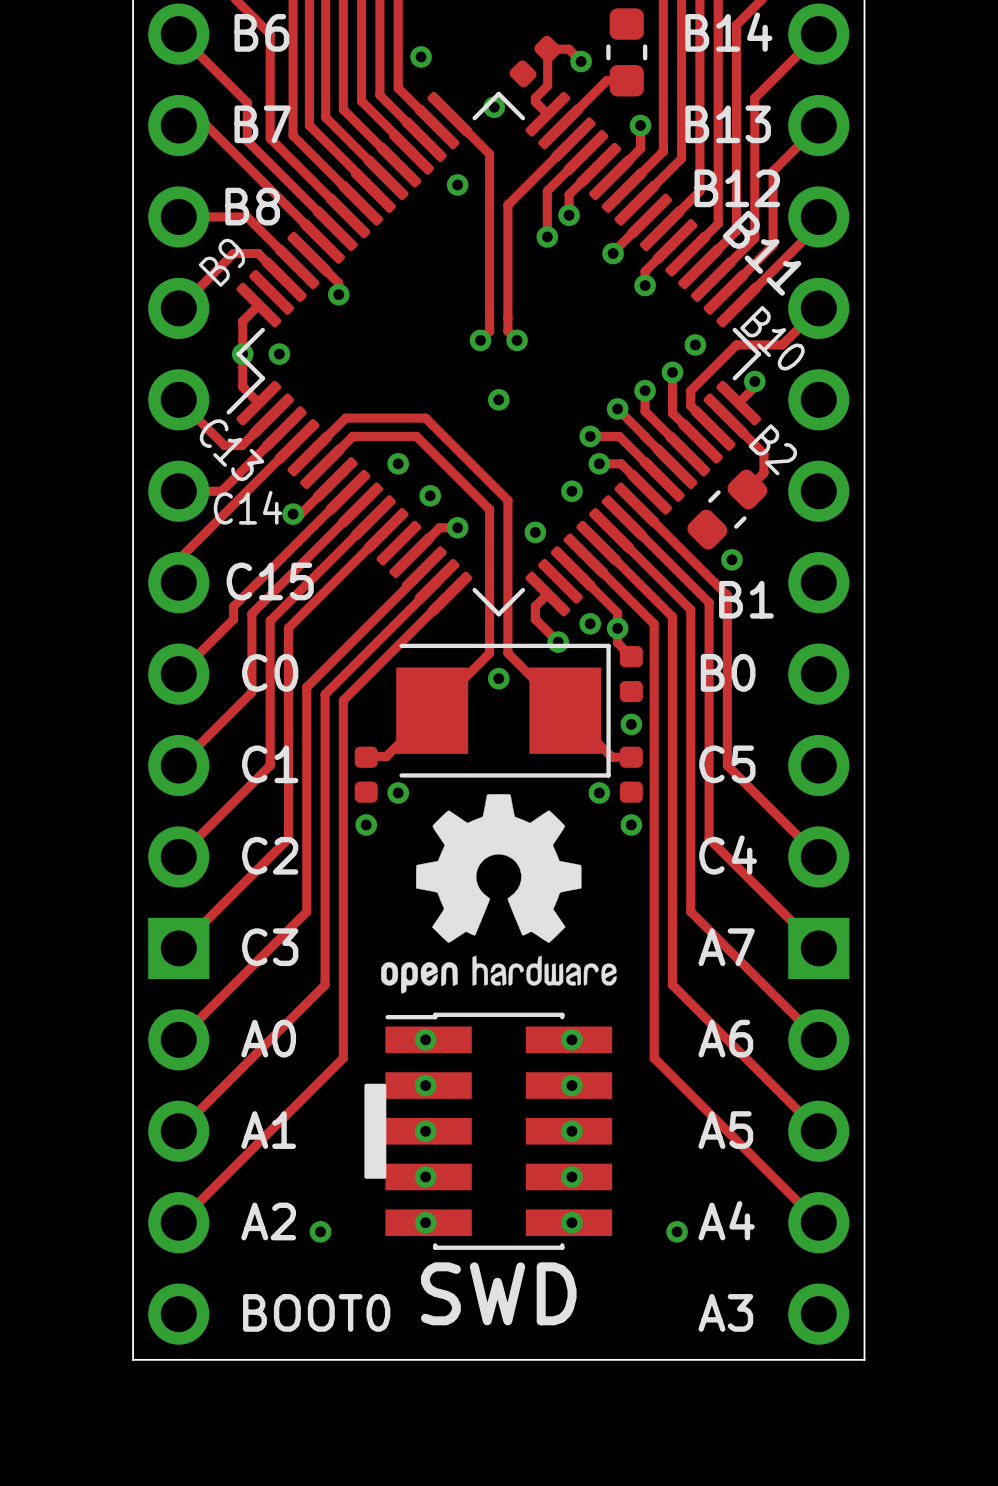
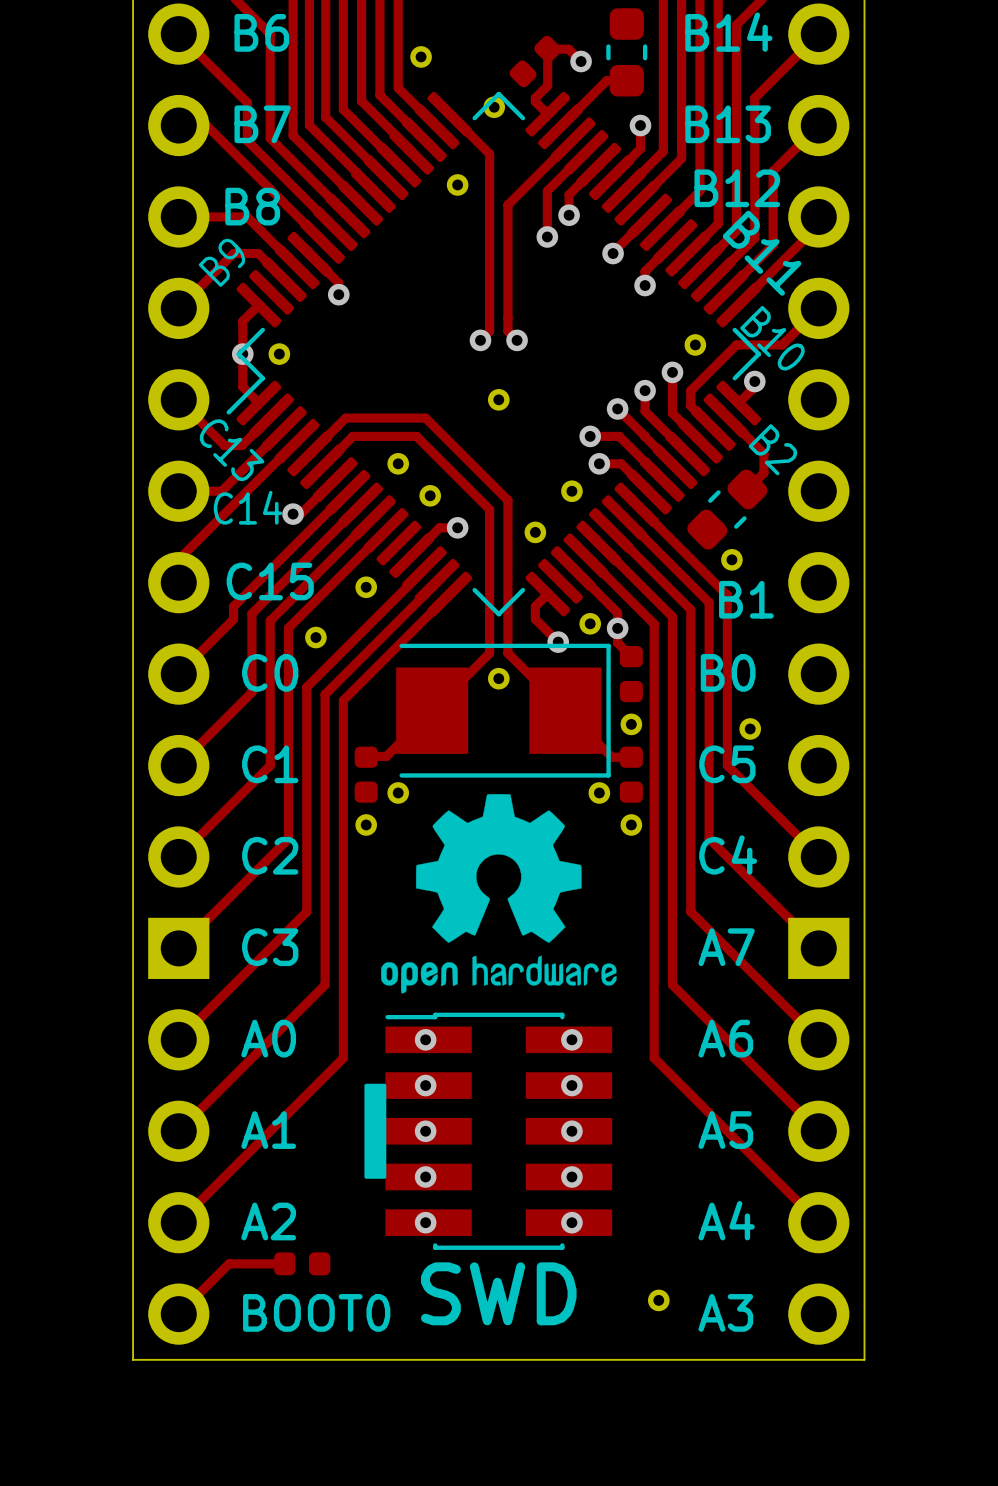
part: none -> (366, 587)
part: none -> (315, 637)
part: none -> (750, 728)
part: (320, 1231) -> none
part position: (677, 1231) -> (658, 1300)
track: none -> (284, 1263) (229, 1263) (178, 1314)
part: none -> (302, 1263)

